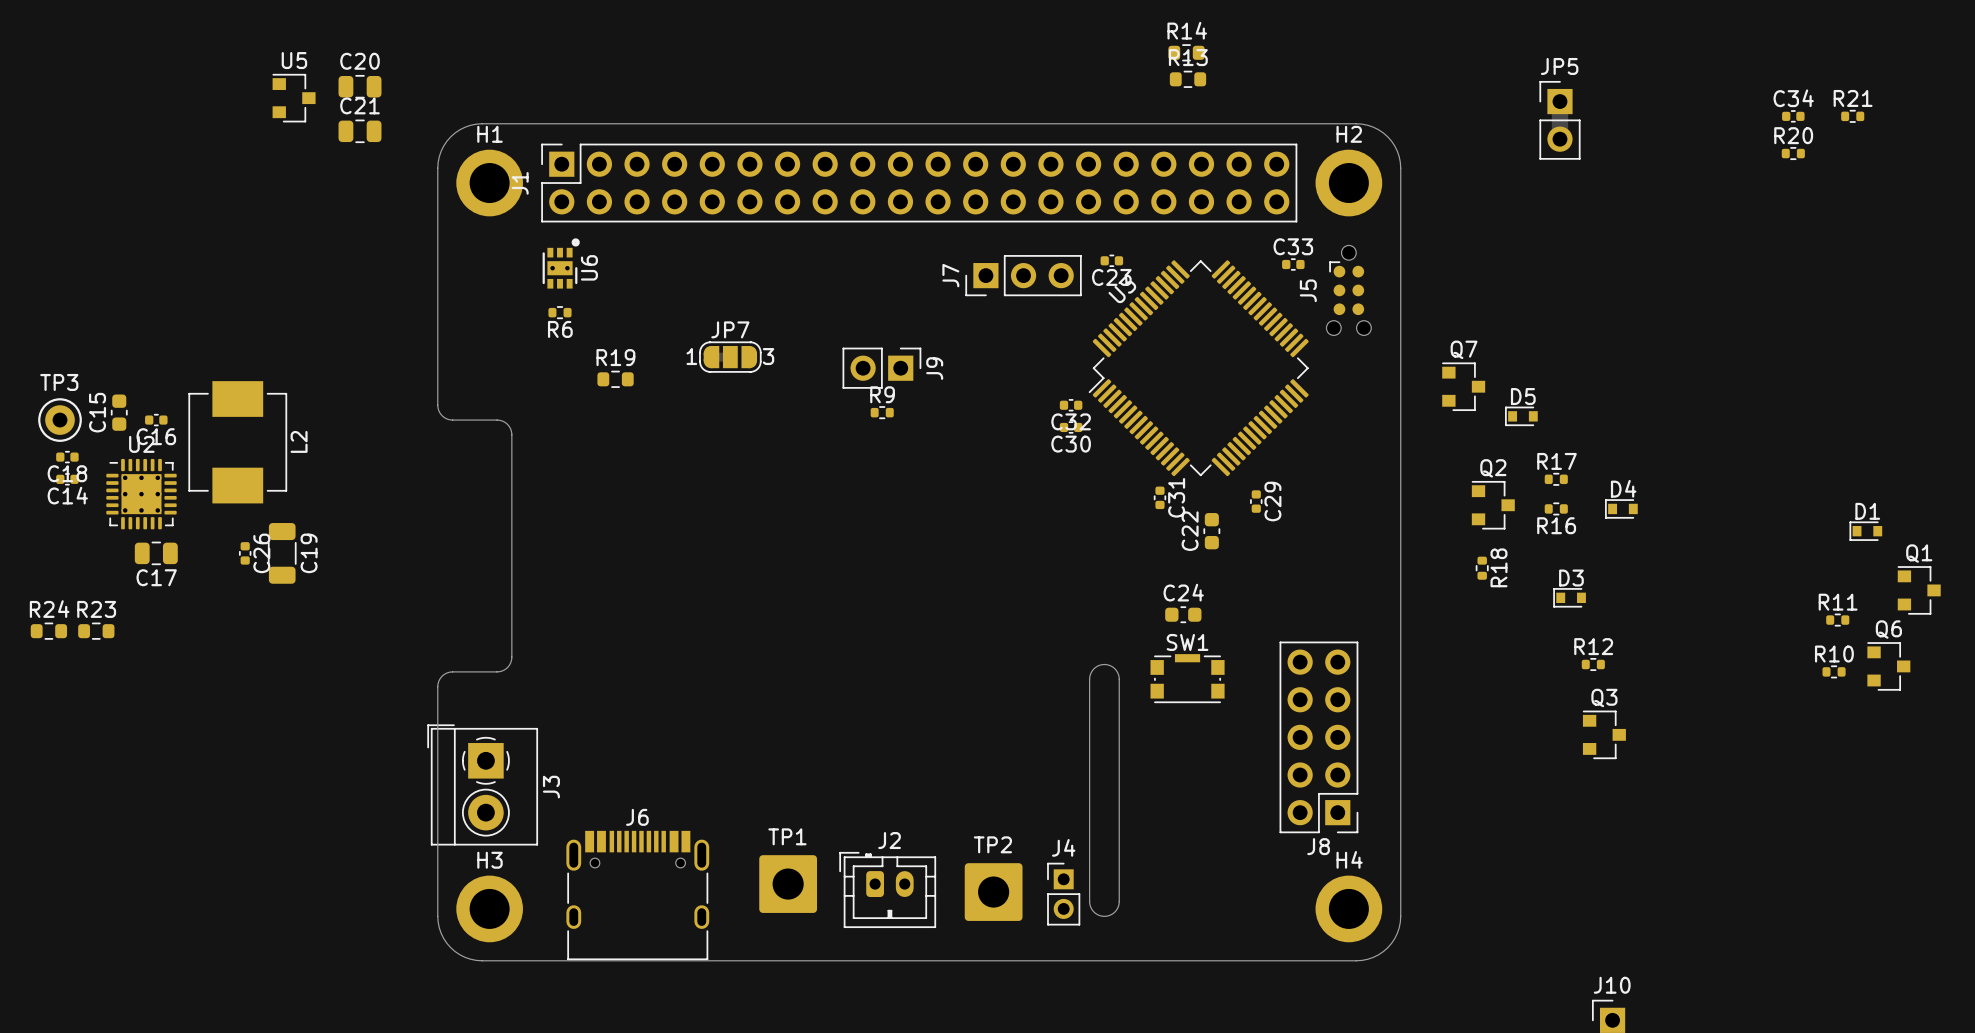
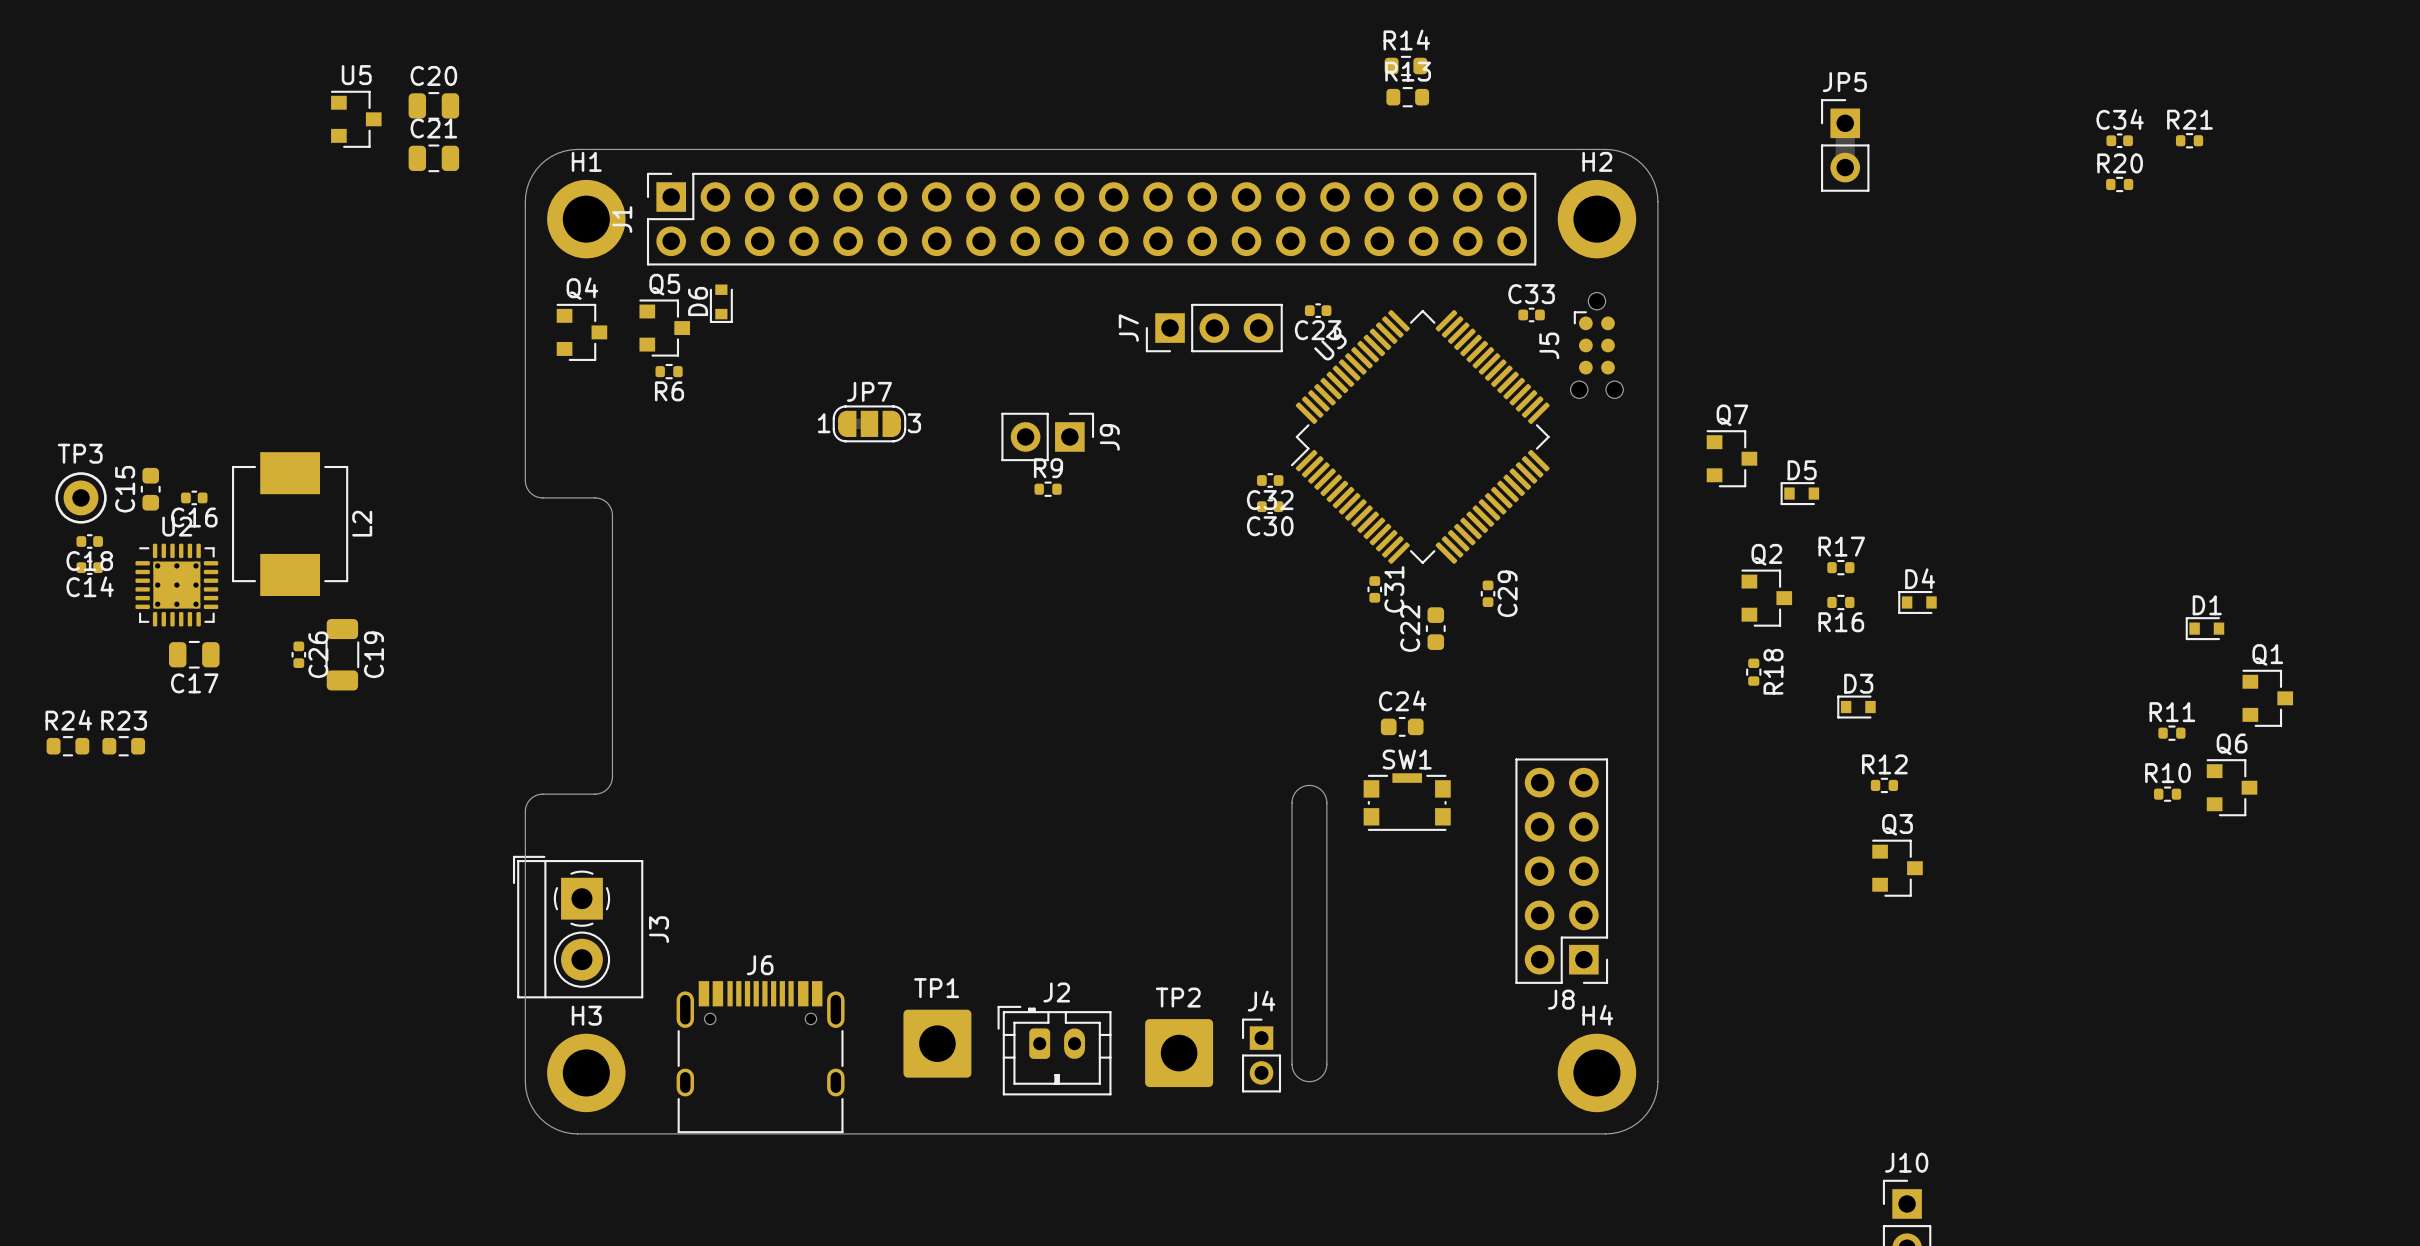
D6: none -> (721, 303)
U6: (561, 263) -> none
Q5: none -> (664, 328)
Q4: none -> (581, 332)
R19: (615, 379) -> none

